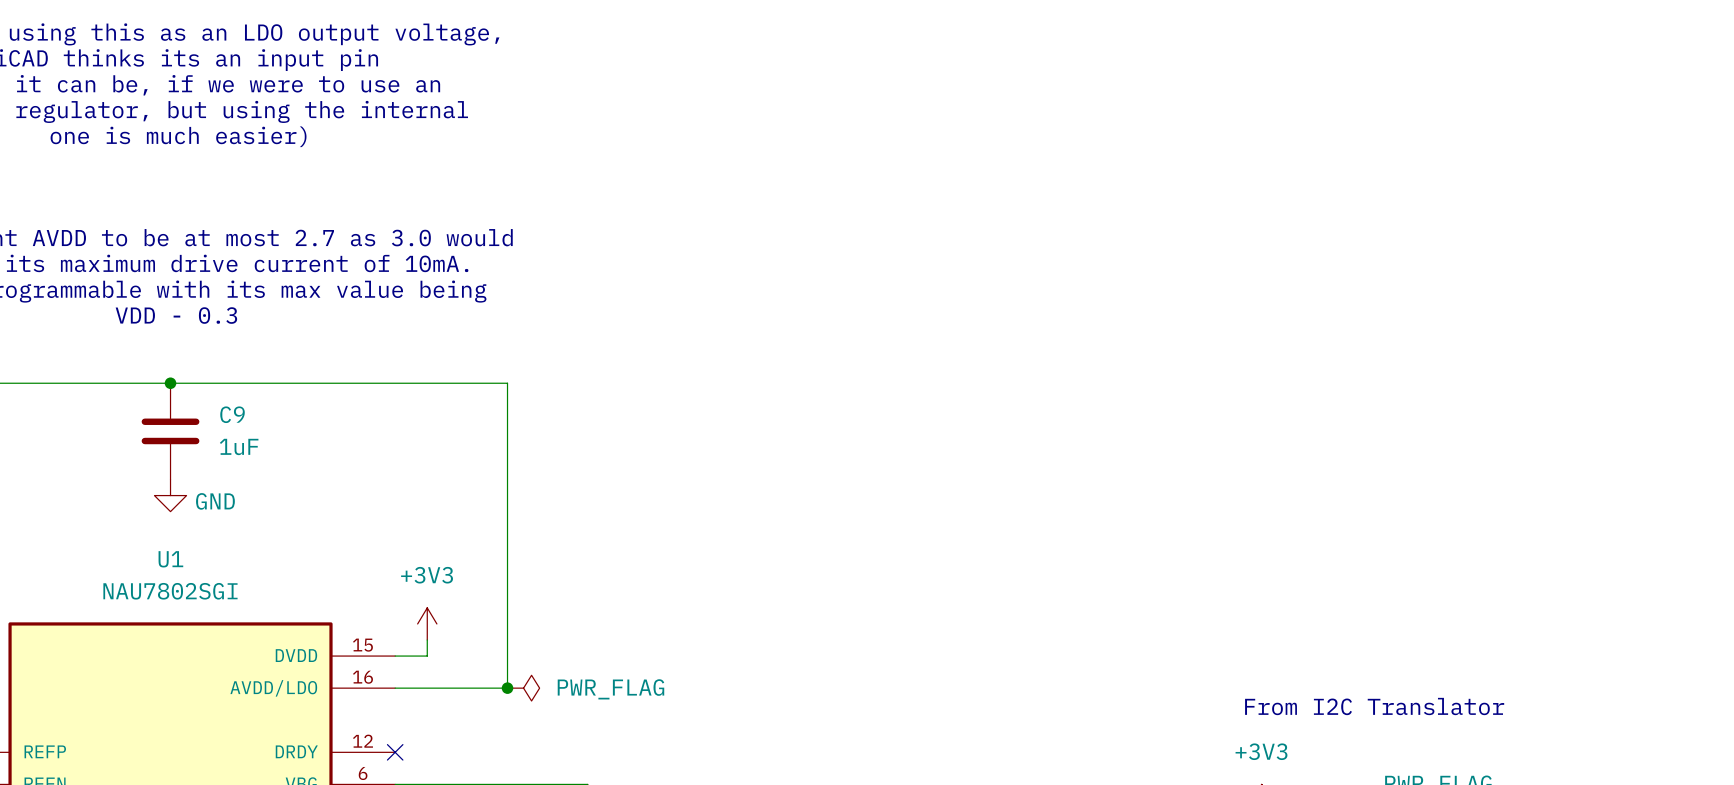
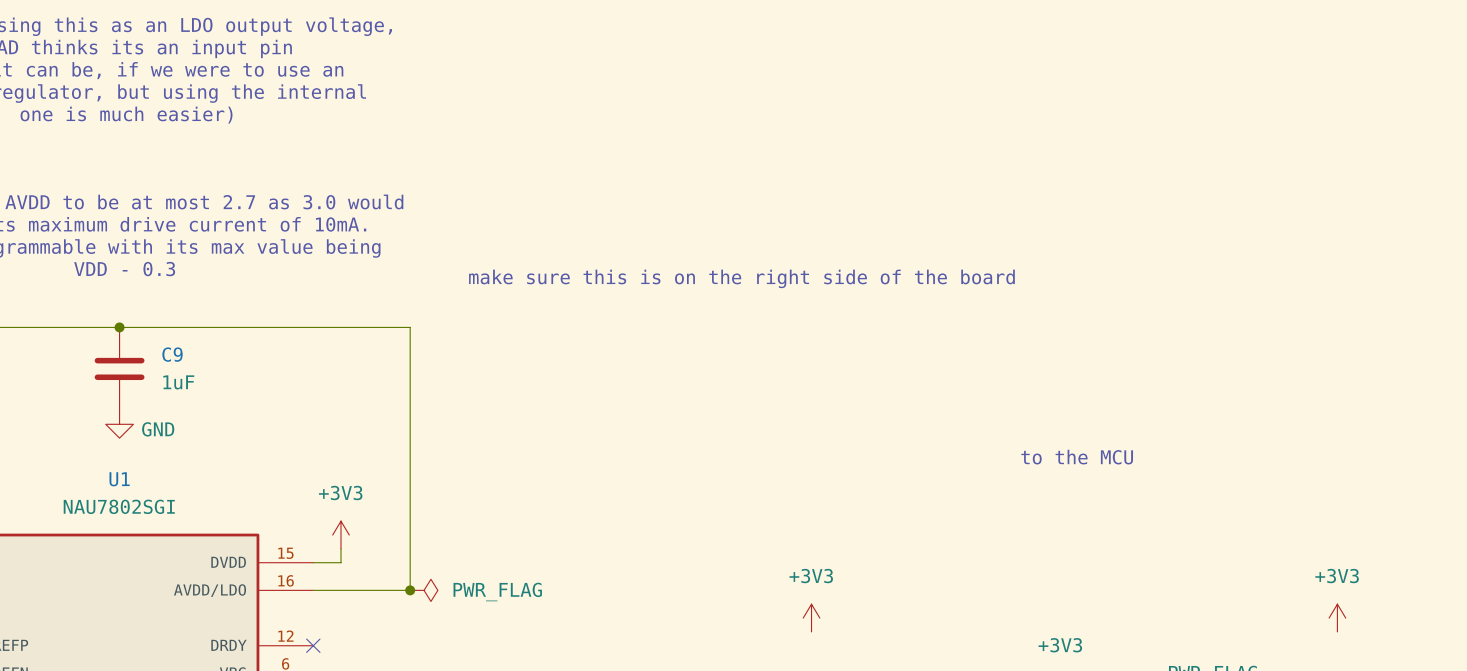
text: none -> make sure this is on the right side of the board (741, 278)
text: none -> to the MCU (1077, 457)
text: From I2C Translator (1374, 706) -> none
power symbol: none -> +3V3 (811, 618)
power symbol: none -> +3V3 (1337, 618)

